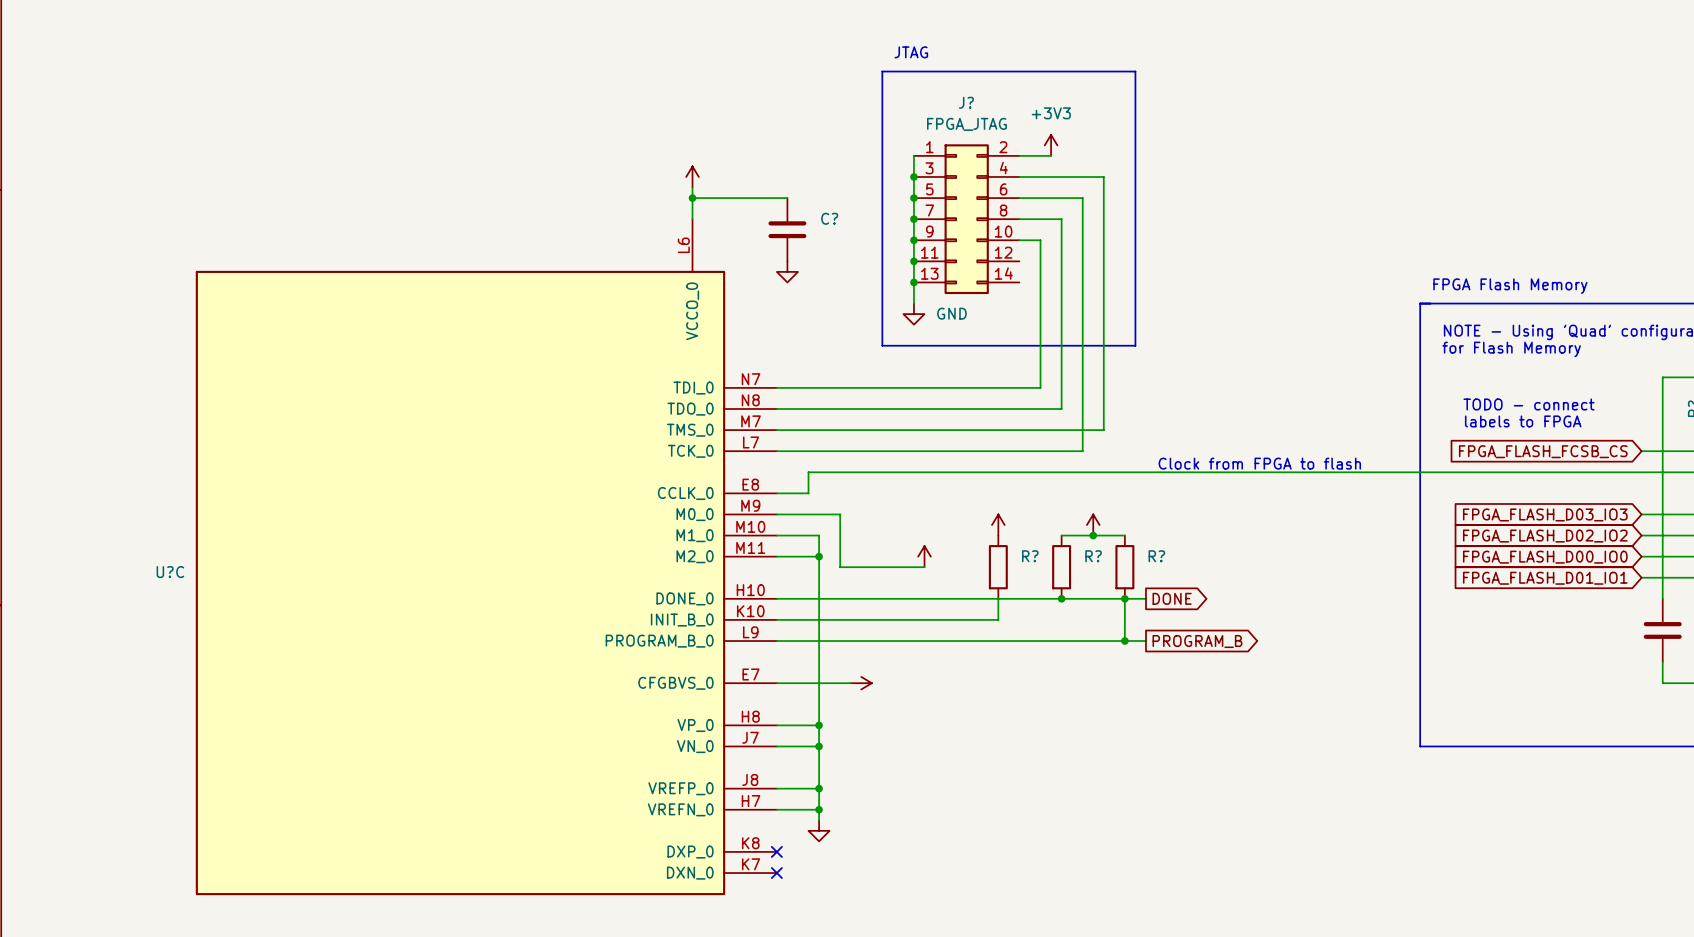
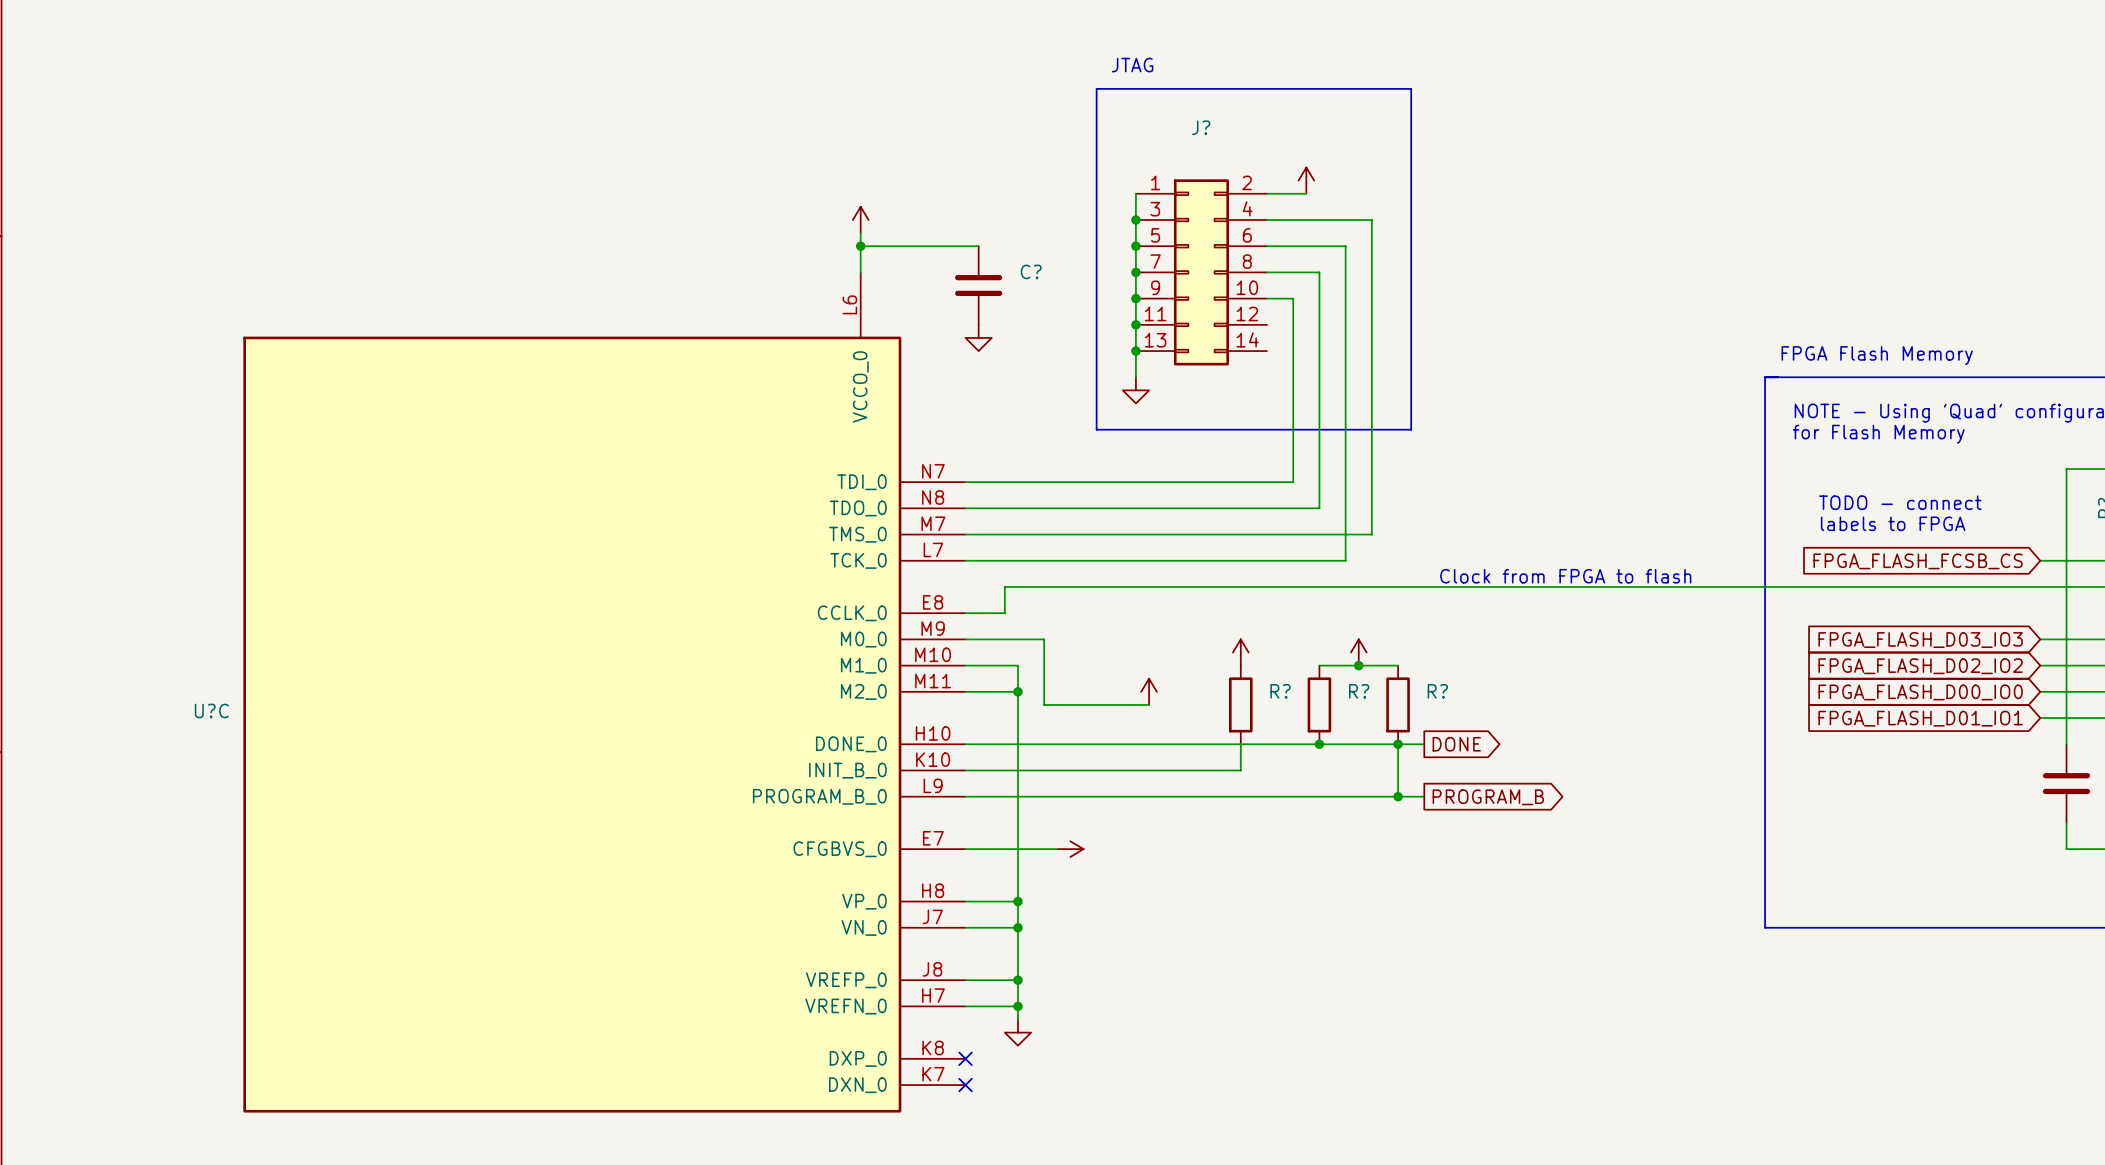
power symbol text: +3V3 (1051, 113) -> none
J? value: FPGA_JTAG (966, 124) -> none
power symbol text: GND (951, 313) -> none

